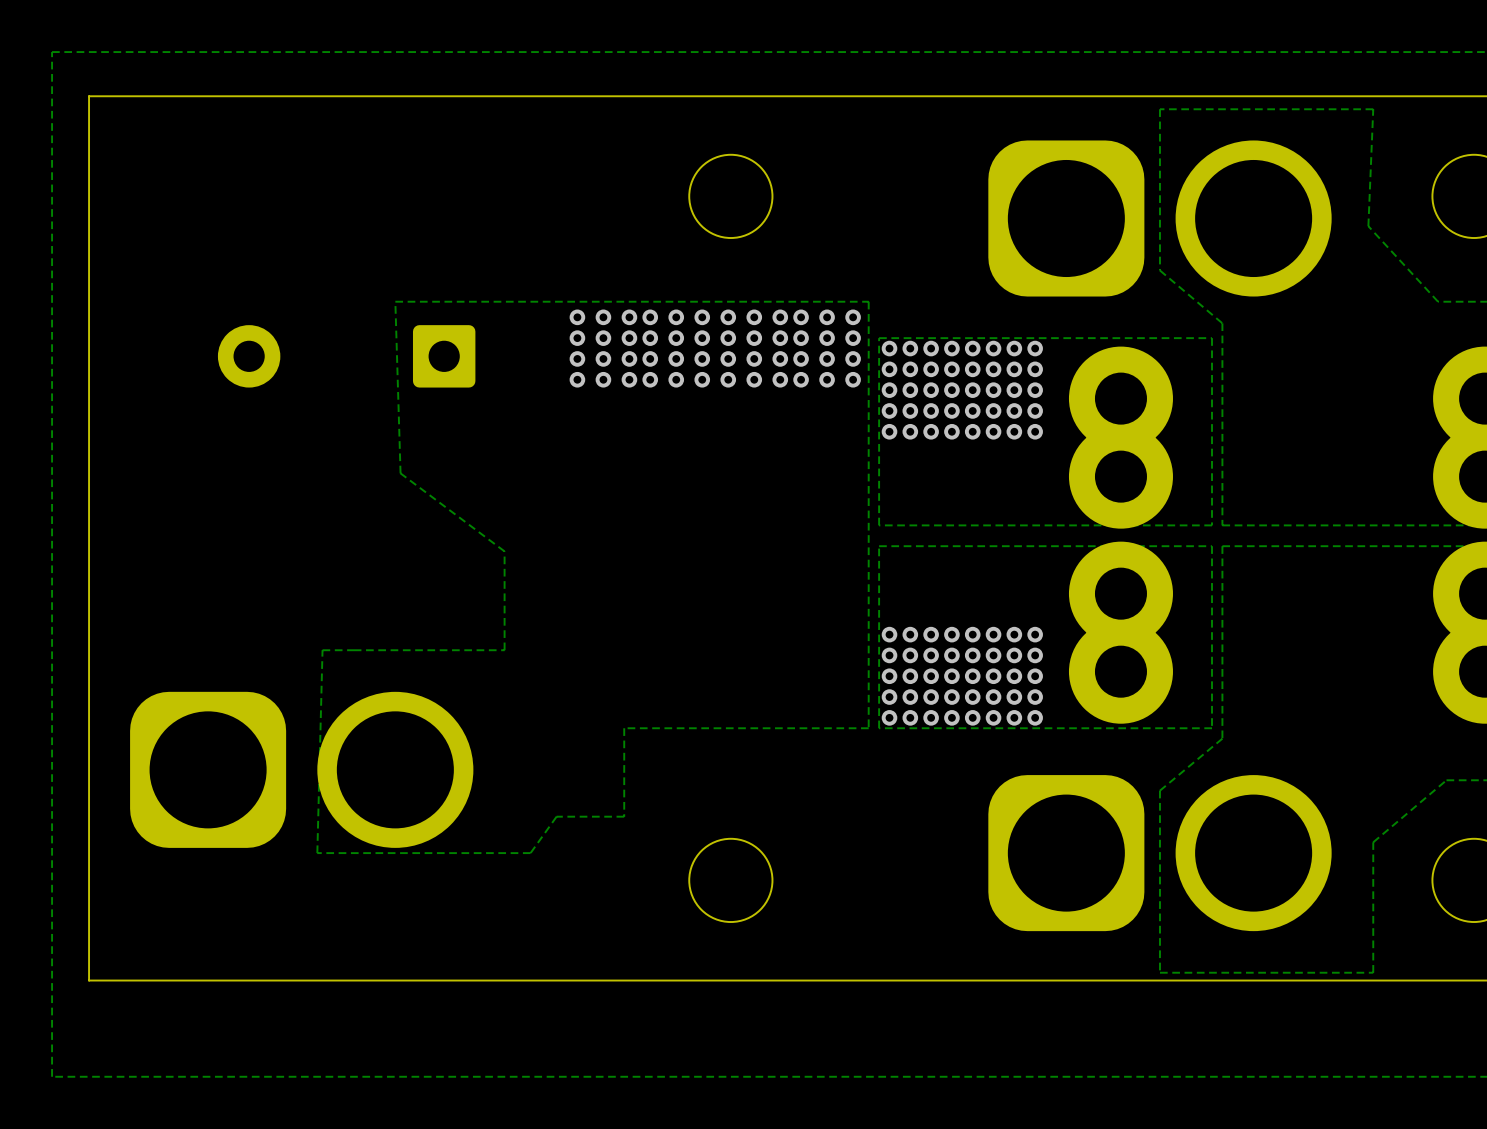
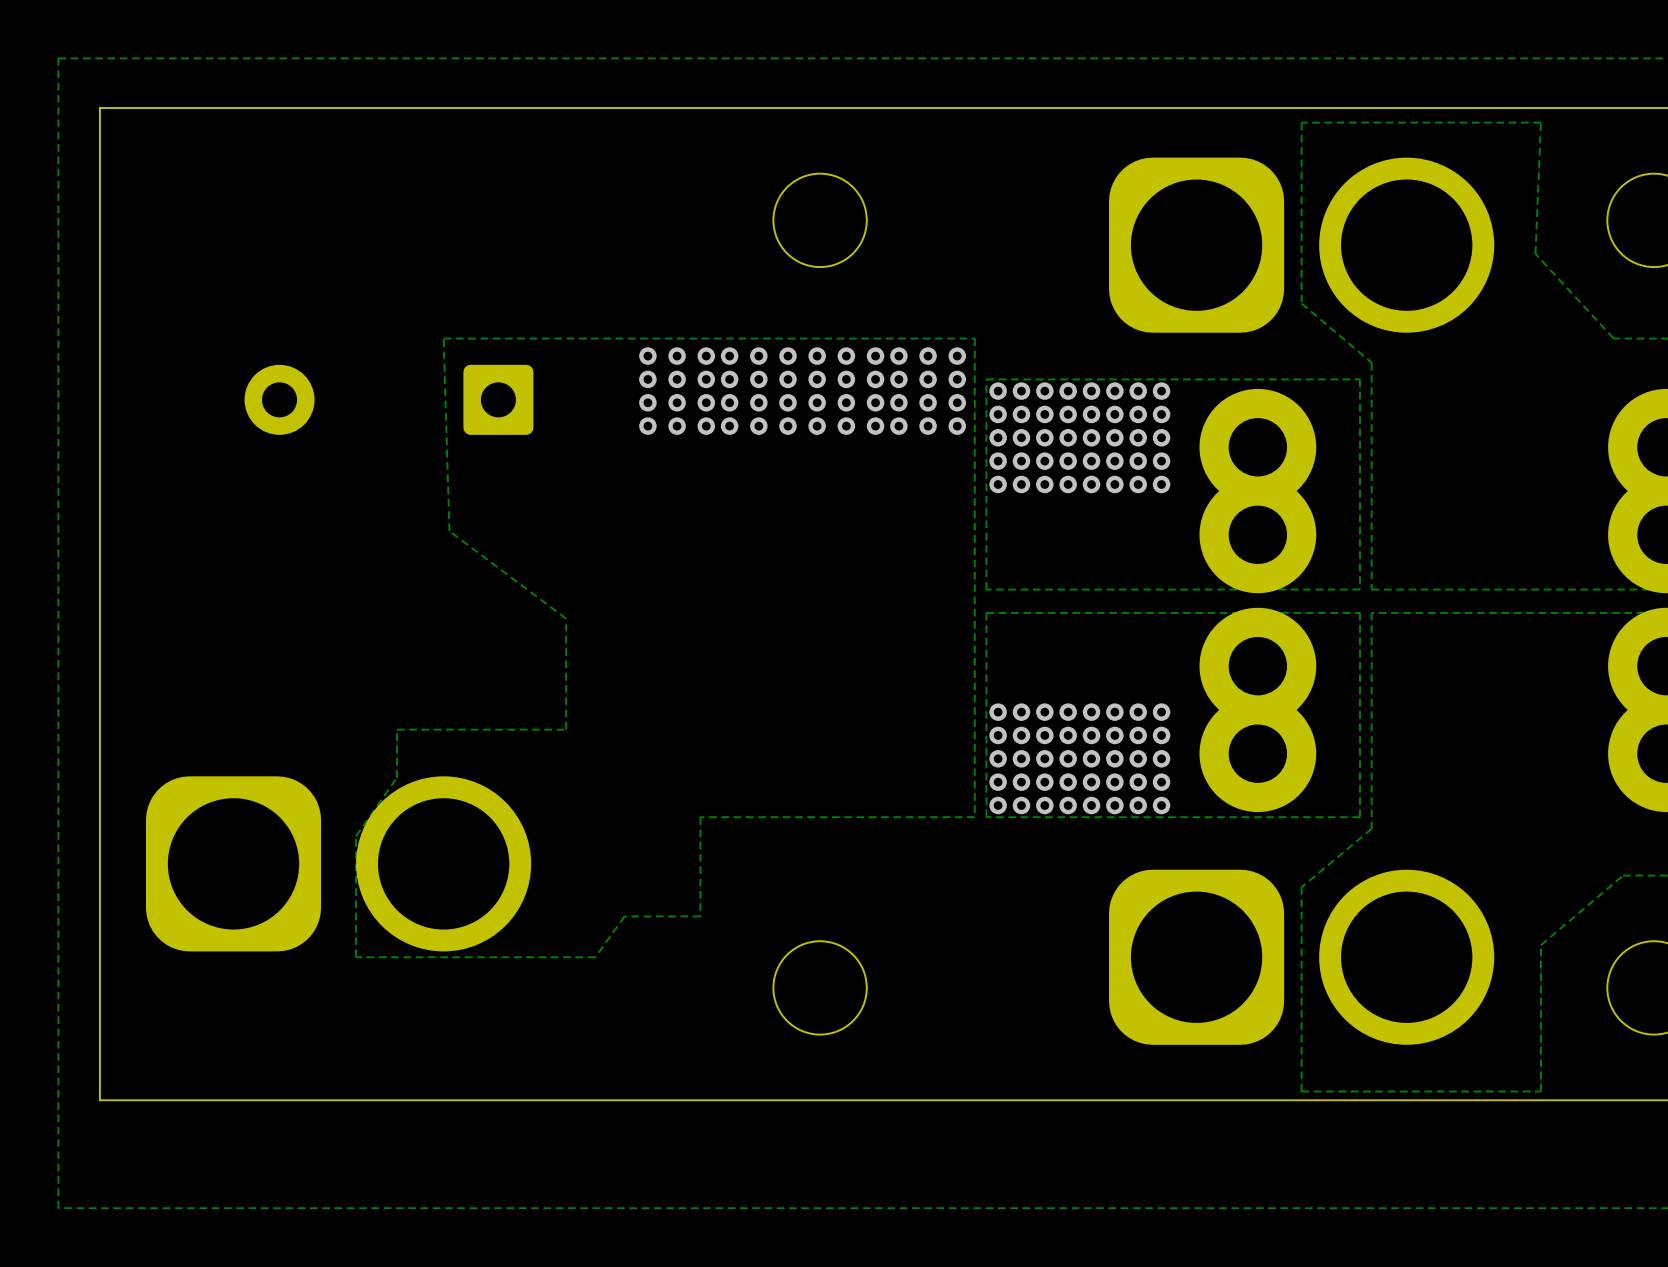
zone outline: (353, 650) (322, 650) (317, 853) -> (396, 729) (396, 777) (356, 836) (356, 957)

